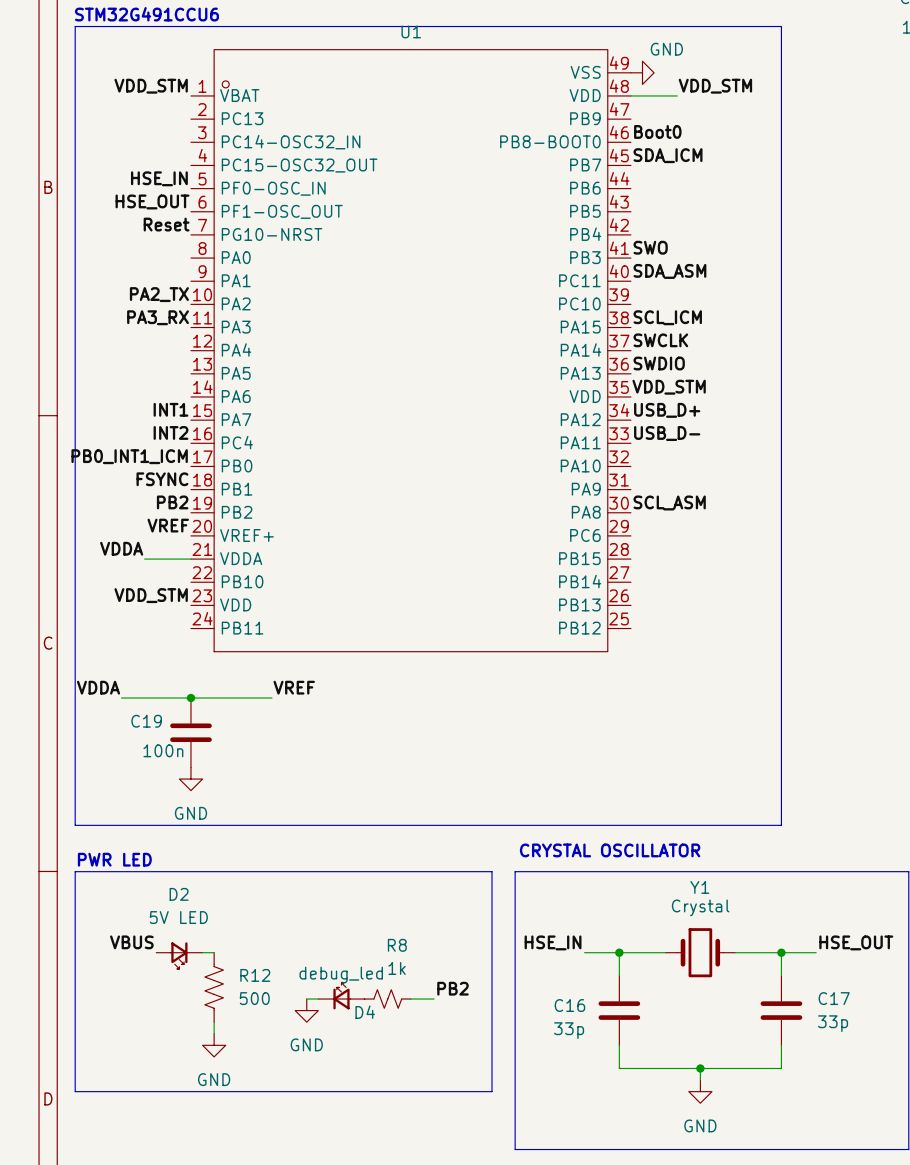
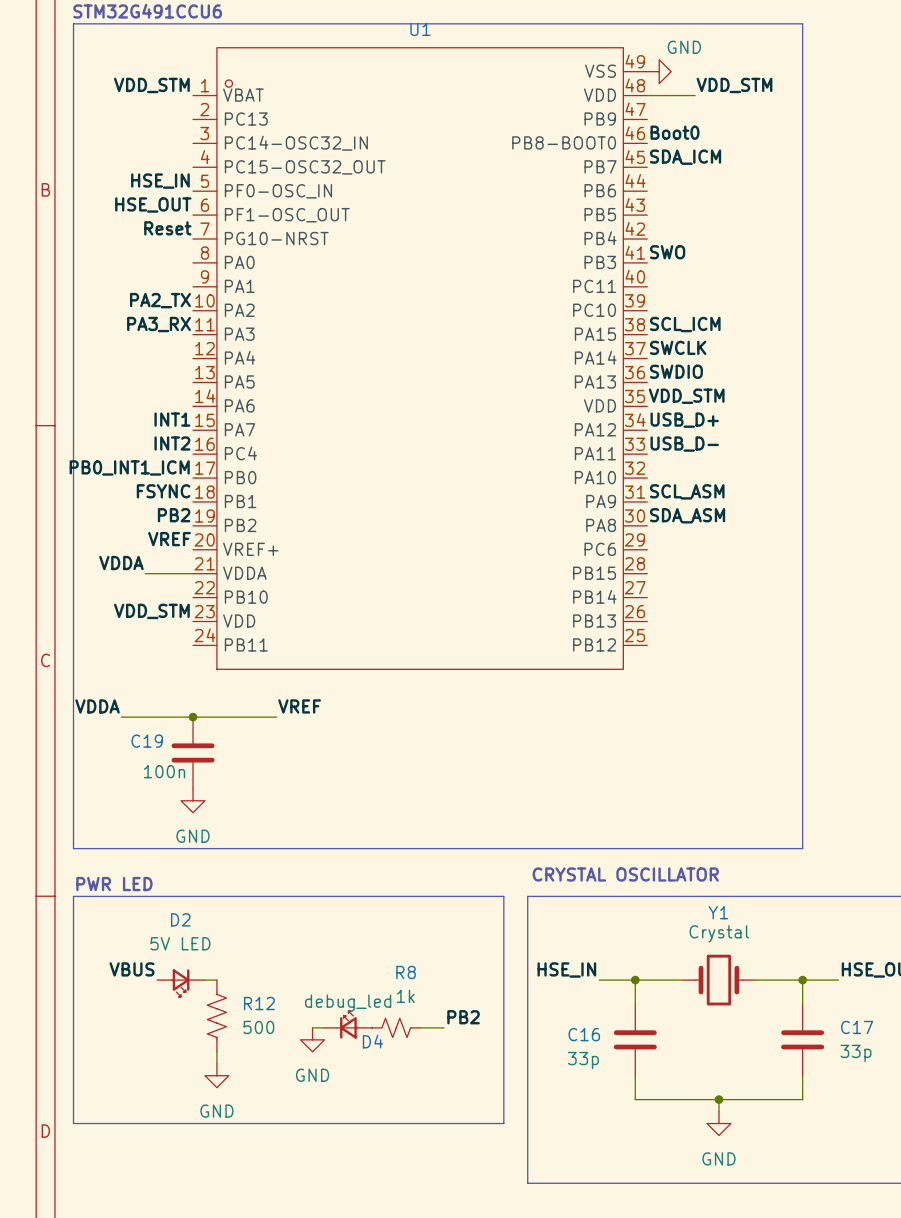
label: SDA_ASM (669, 271) -> none
label: none -> SCL_ASM (687, 491)
label: SCL_ASM (669, 502) -> SDA_ASM (687, 515)

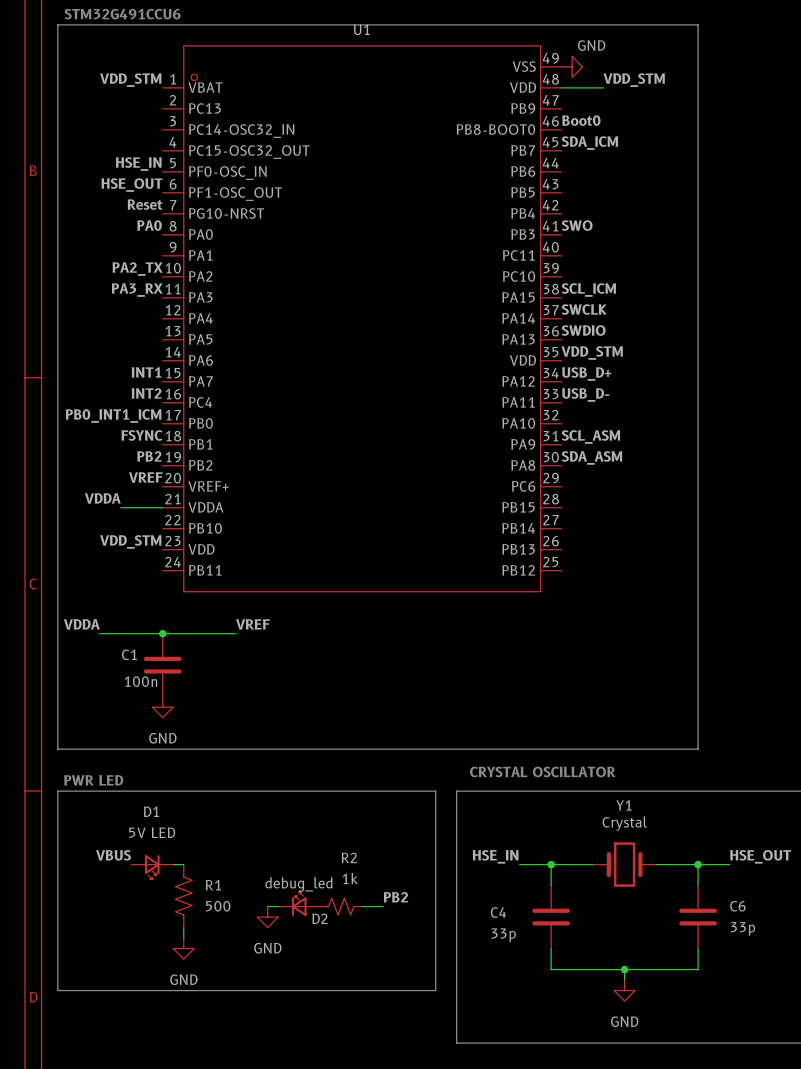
label: none -> PA0 (149, 225)
C19 name: C19 (147, 741) -> C1 (129, 654)
D2 name: D2 (180, 919) -> D1 (151, 811)
R8 name: R8 (406, 972) -> R2 (349, 857)
R12 name: R12 (259, 1003) -> R1 (213, 885)
C17 name: C17 (857, 1027) -> C6 (737, 906)
C16 name: C16 (584, 1034) -> C4 (498, 912)
D4 name: D4 (372, 1041) -> D2 (319, 918)

